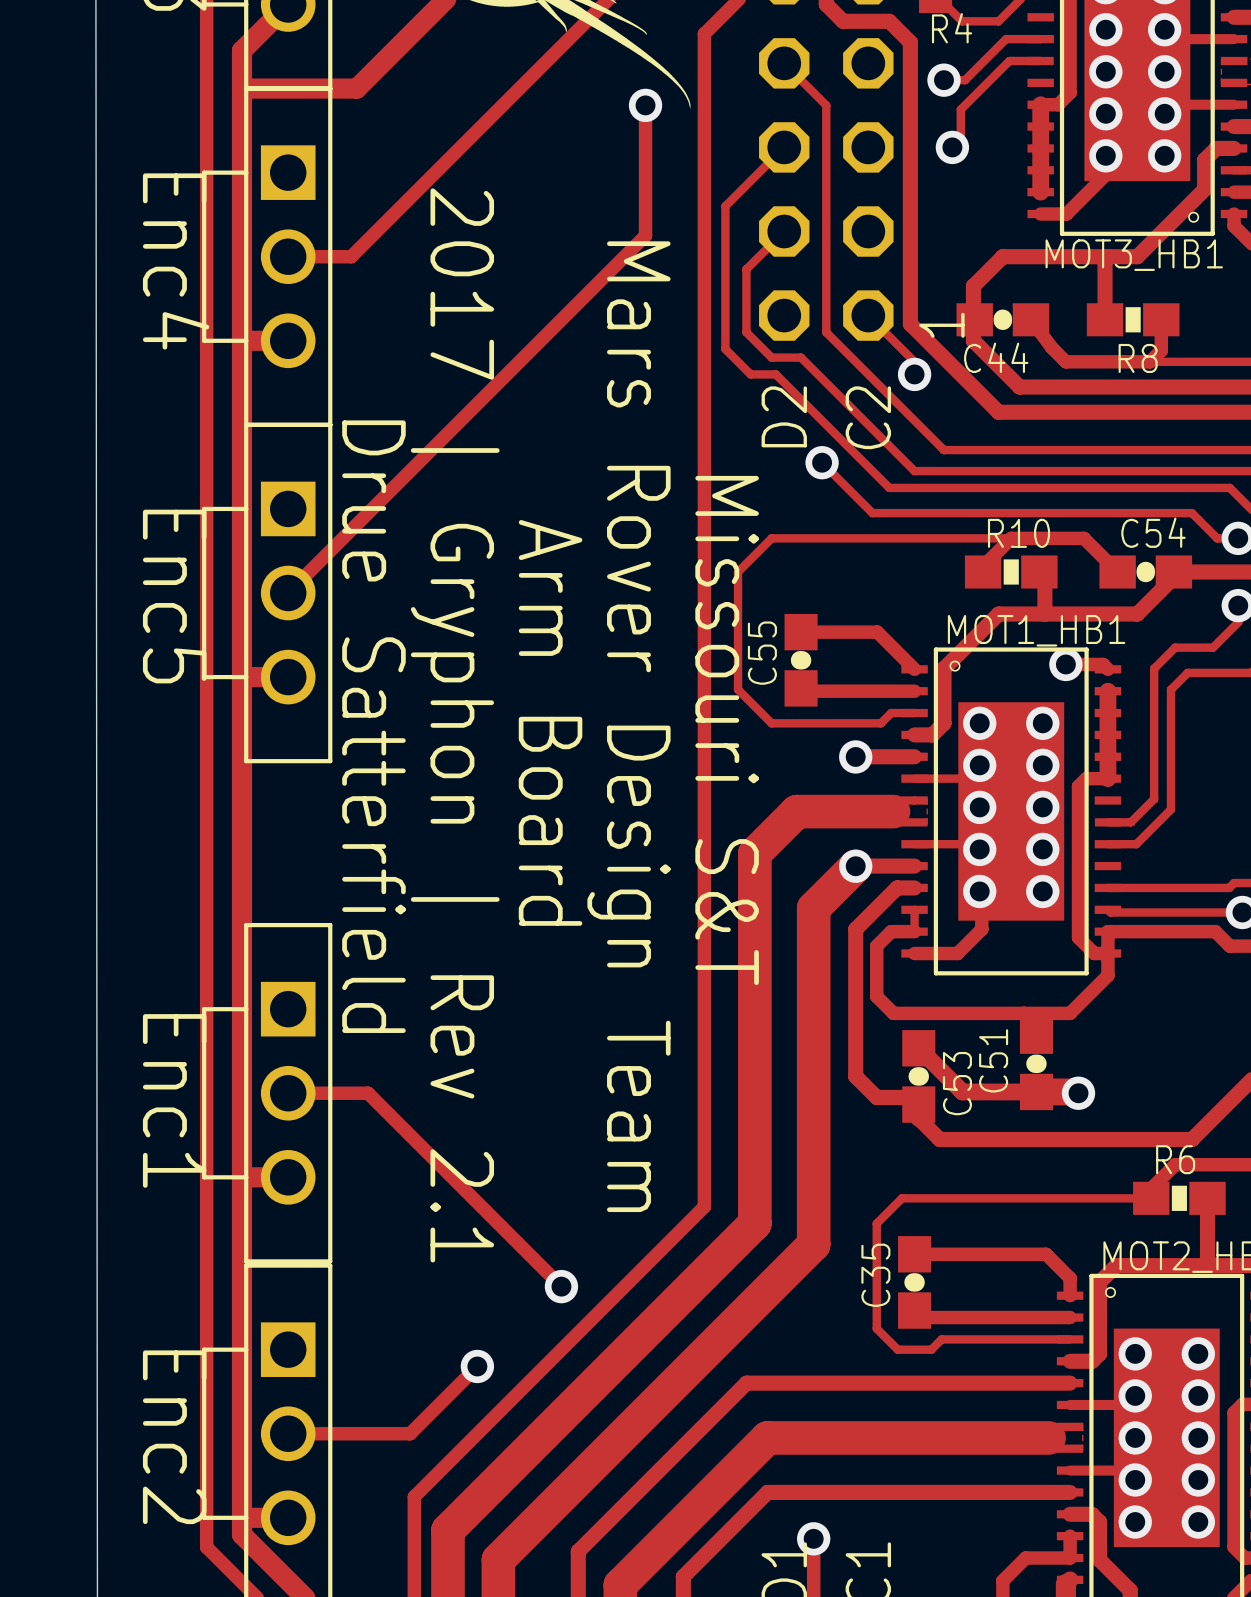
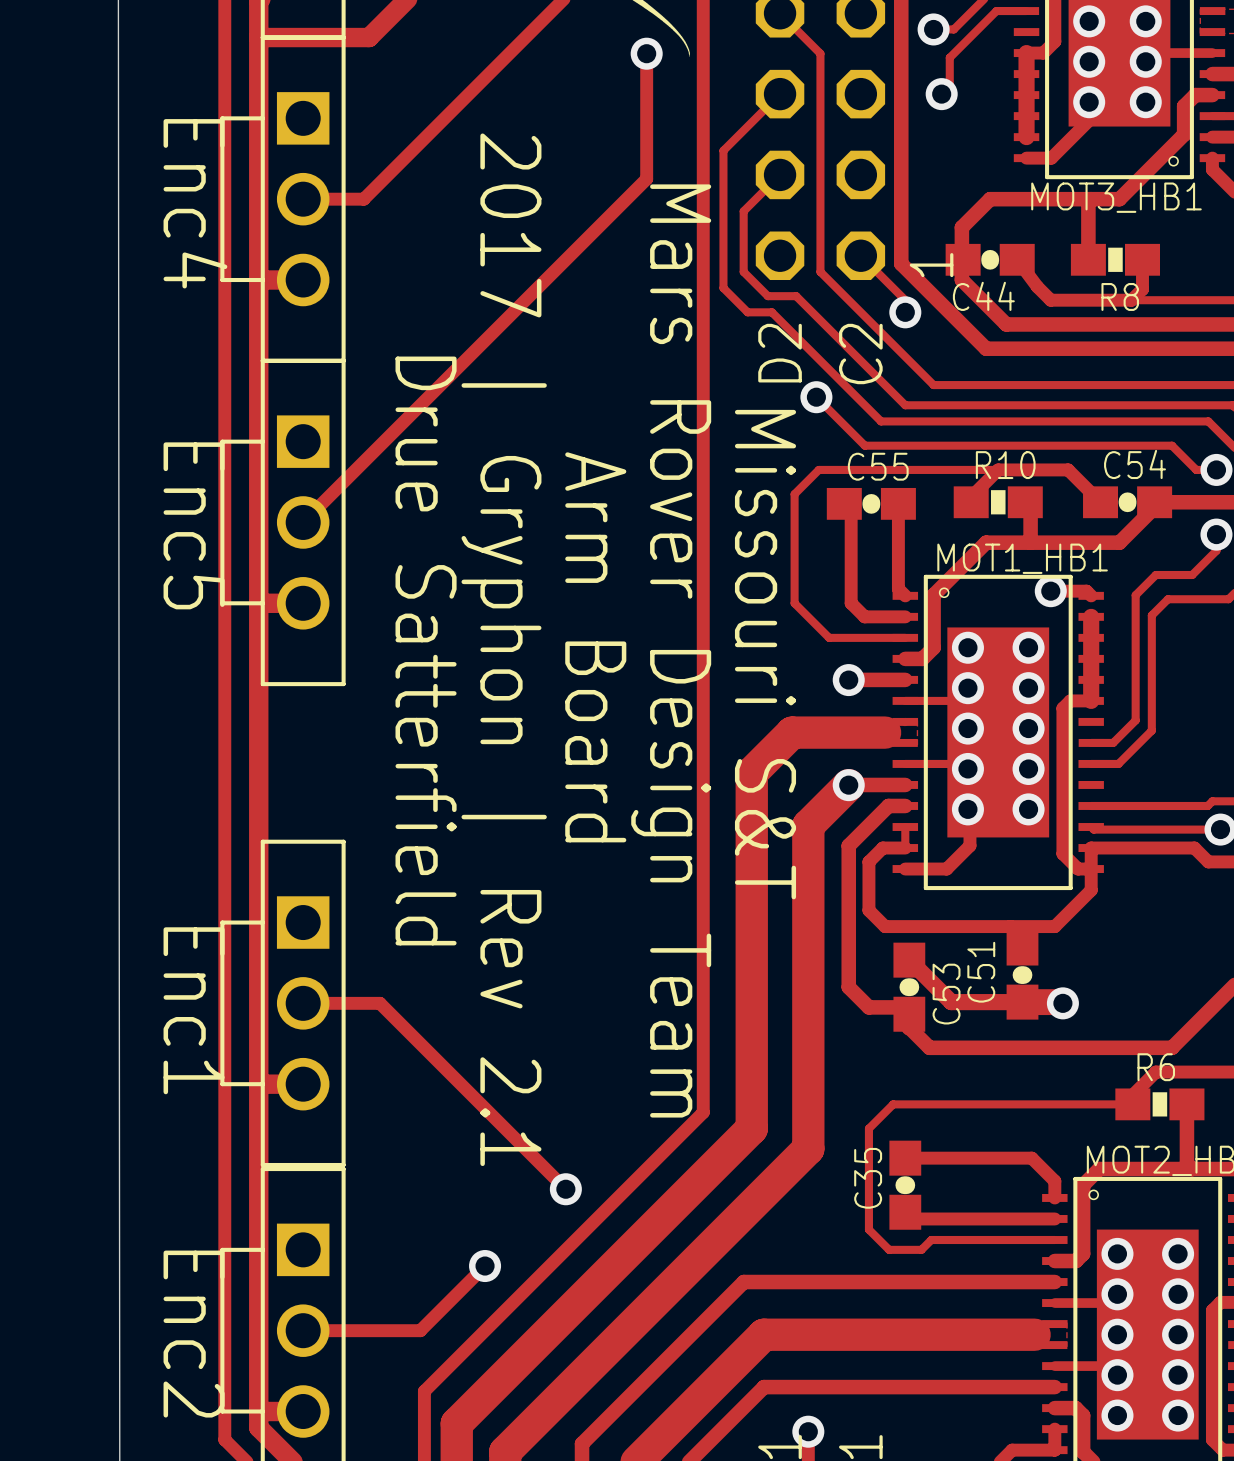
track: (824, 538) (771, 538) (738, 571) (738, 689) (771, 723) (880, 723) (891, 713) -> (818, 469) (794, 494) (794, 603) (829, 637) (882, 637)
track: (801, 632) (877, 632) (907, 662) -> (898, 503) (898, 588)
C55 rotation: 0° (801, 660) -> 90° clockwise (871, 503)
C55 position: (801, 660) -> (871, 503)
track: (801, 688) (801, 691) (872, 691) -> (844, 503) (851, 510) (851, 603) (864, 616)
text position: Arm Board (550, 722) -> Arm Board (595, 647)
text position: 2017 | Gryphon | Rev 2.1 (455, 725) -> 2017 | Gryphon | Rev 2.1 (504, 649)
text position: Drue Satterfield (373, 726) -> Drue Satterfield (426, 650)
text position: Mars Rover Design Team (629, 726) -> Mars Rover Design Team (671, 650)
text position: Missouri S&T (727, 730) -> Missouri S&T (765, 654)

